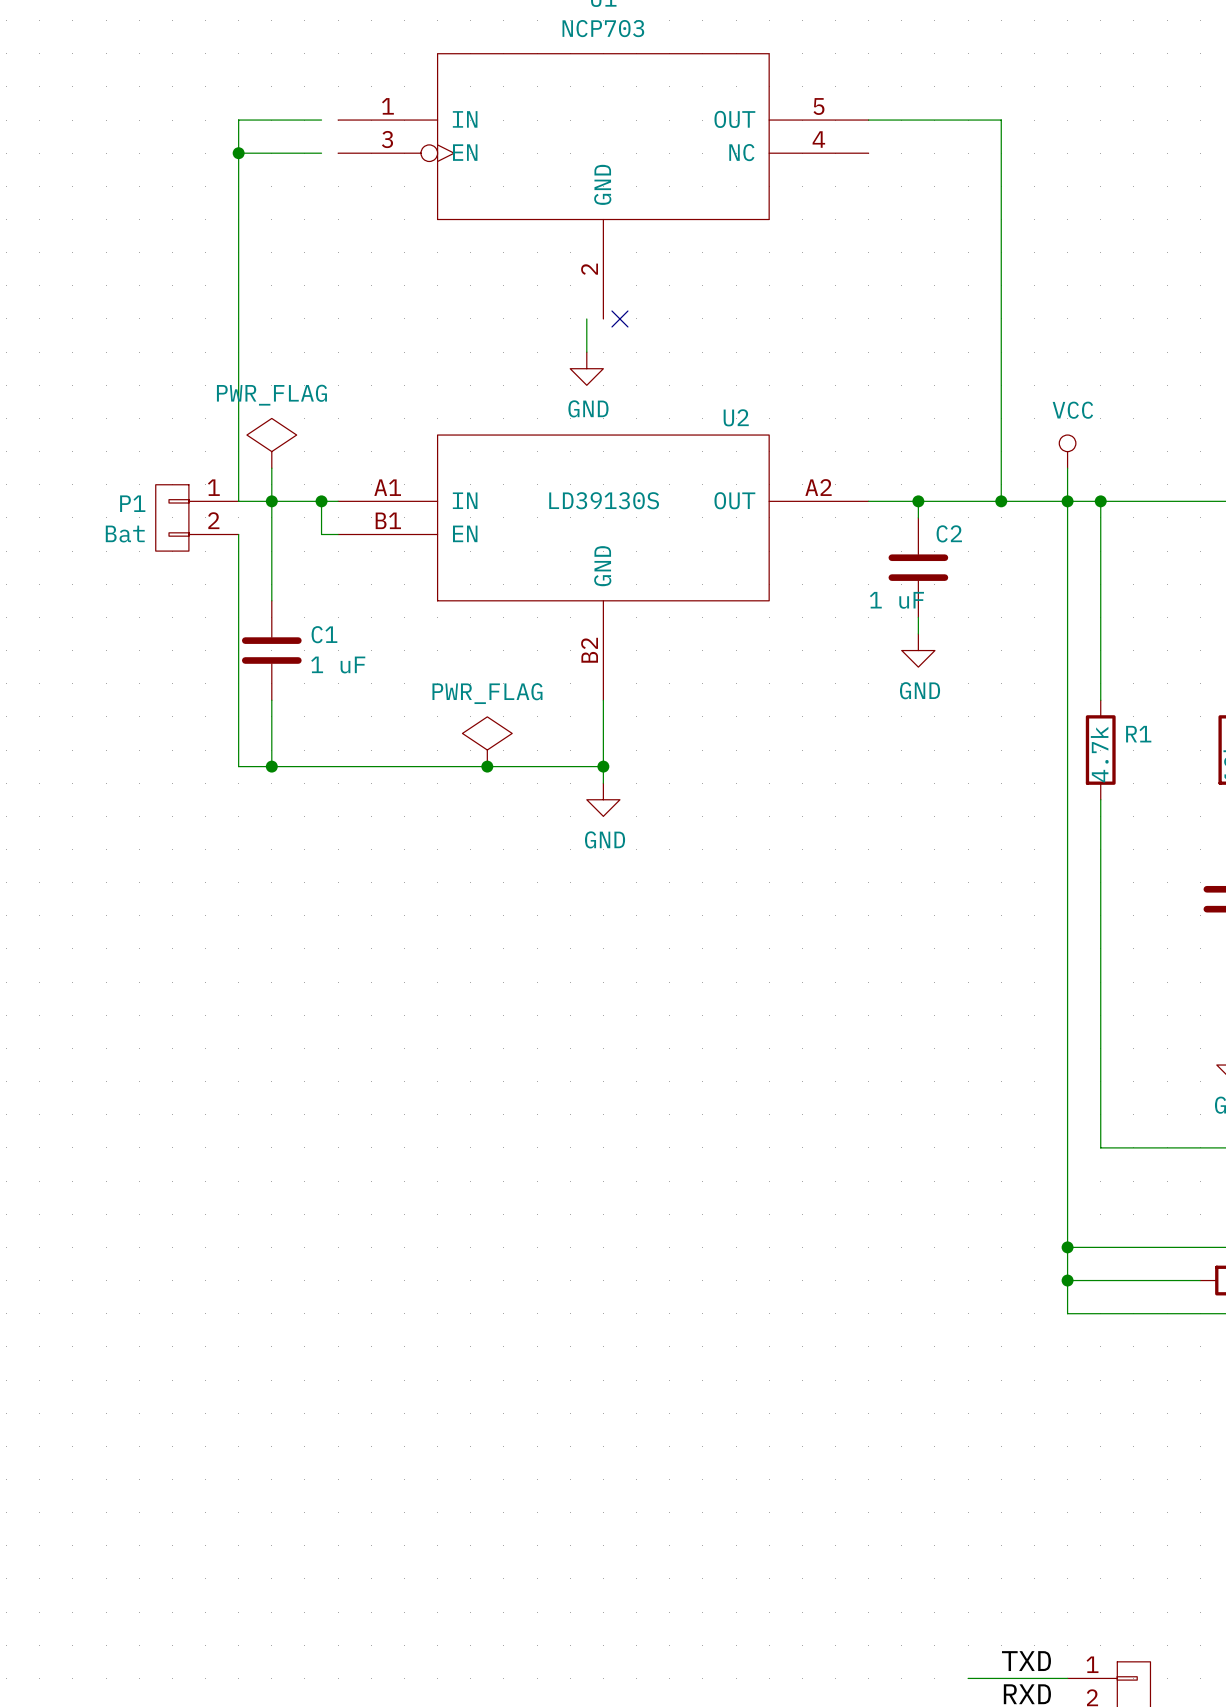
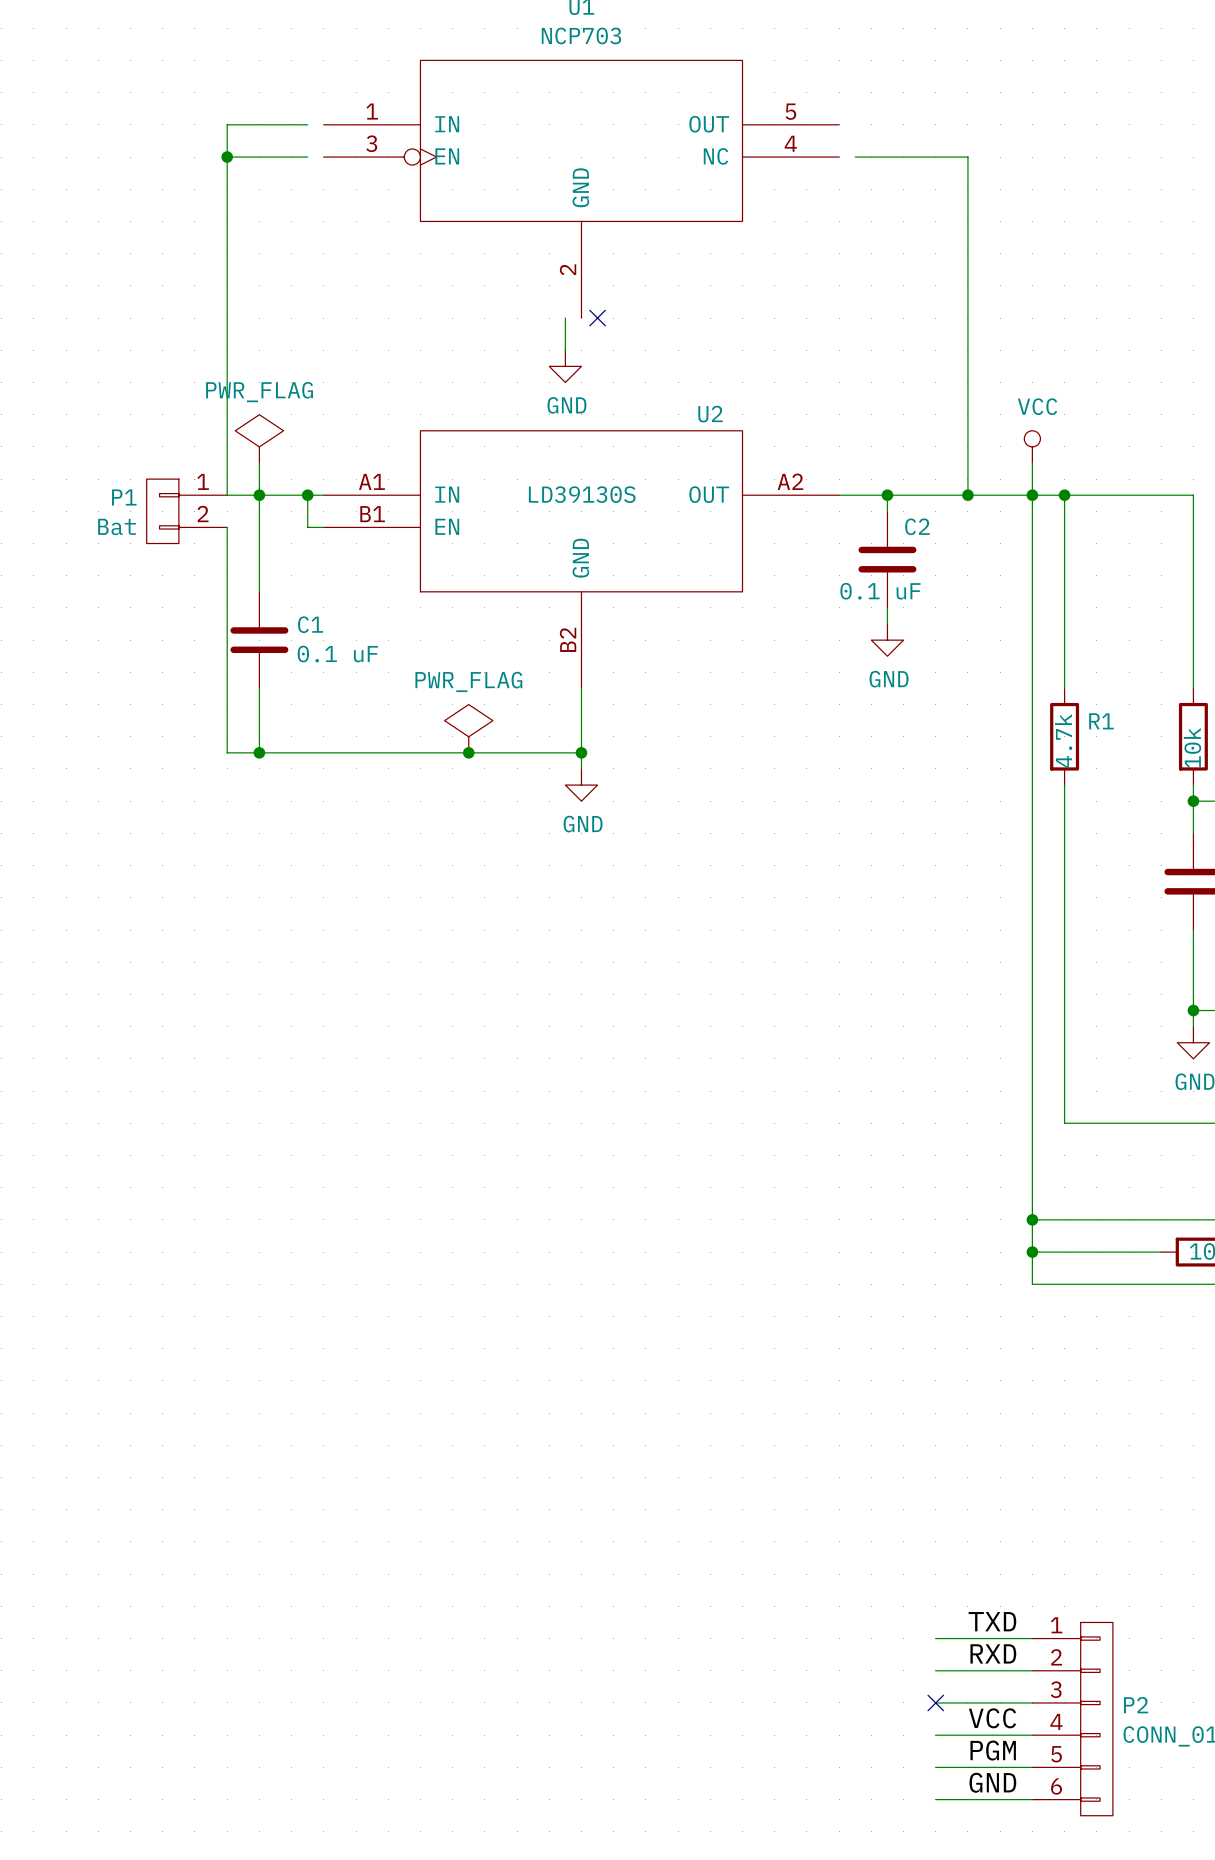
wire: (868, 120) (1001, 120) (1001, 153) -> (855, 157) (967, 157)
C2 value: 1 uF (896, 600) -> 0.1 uF (880, 591)
C1 value: 1 uF (338, 664) -> 0.1 uF (337, 654)

